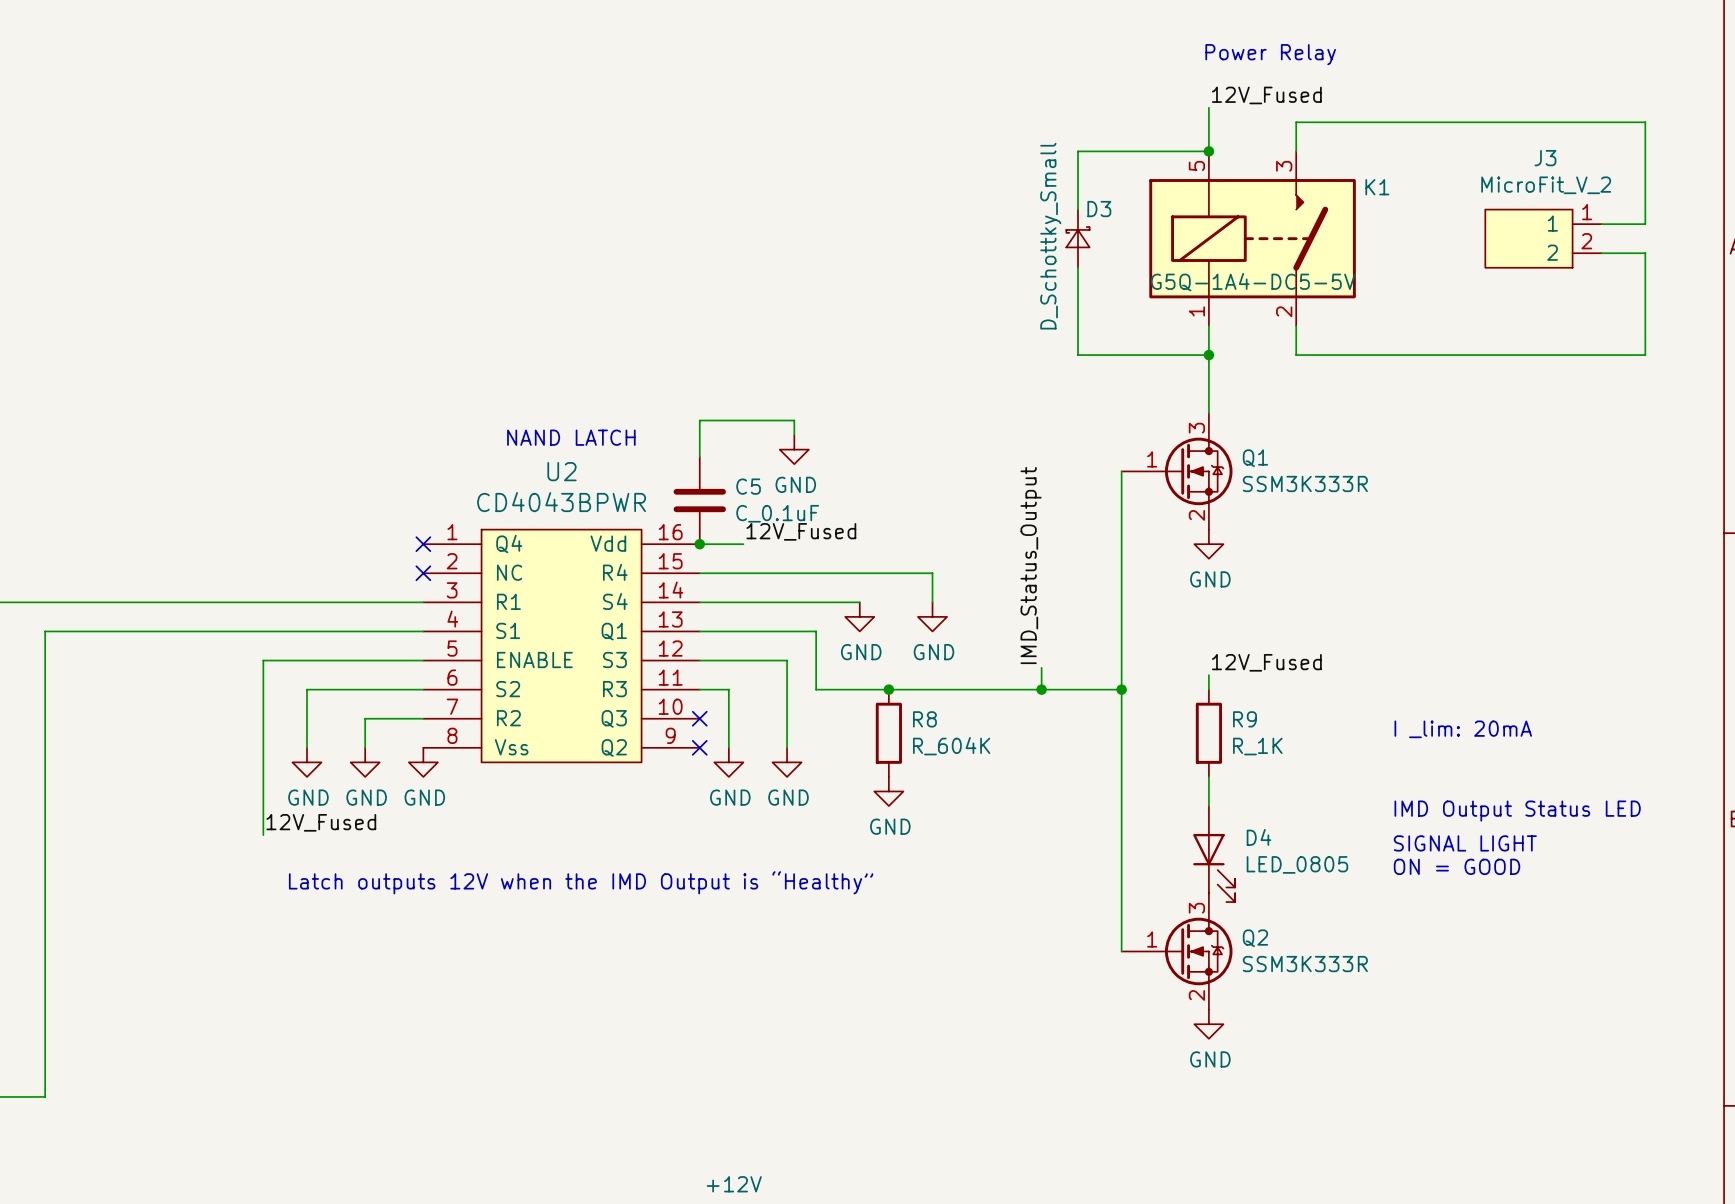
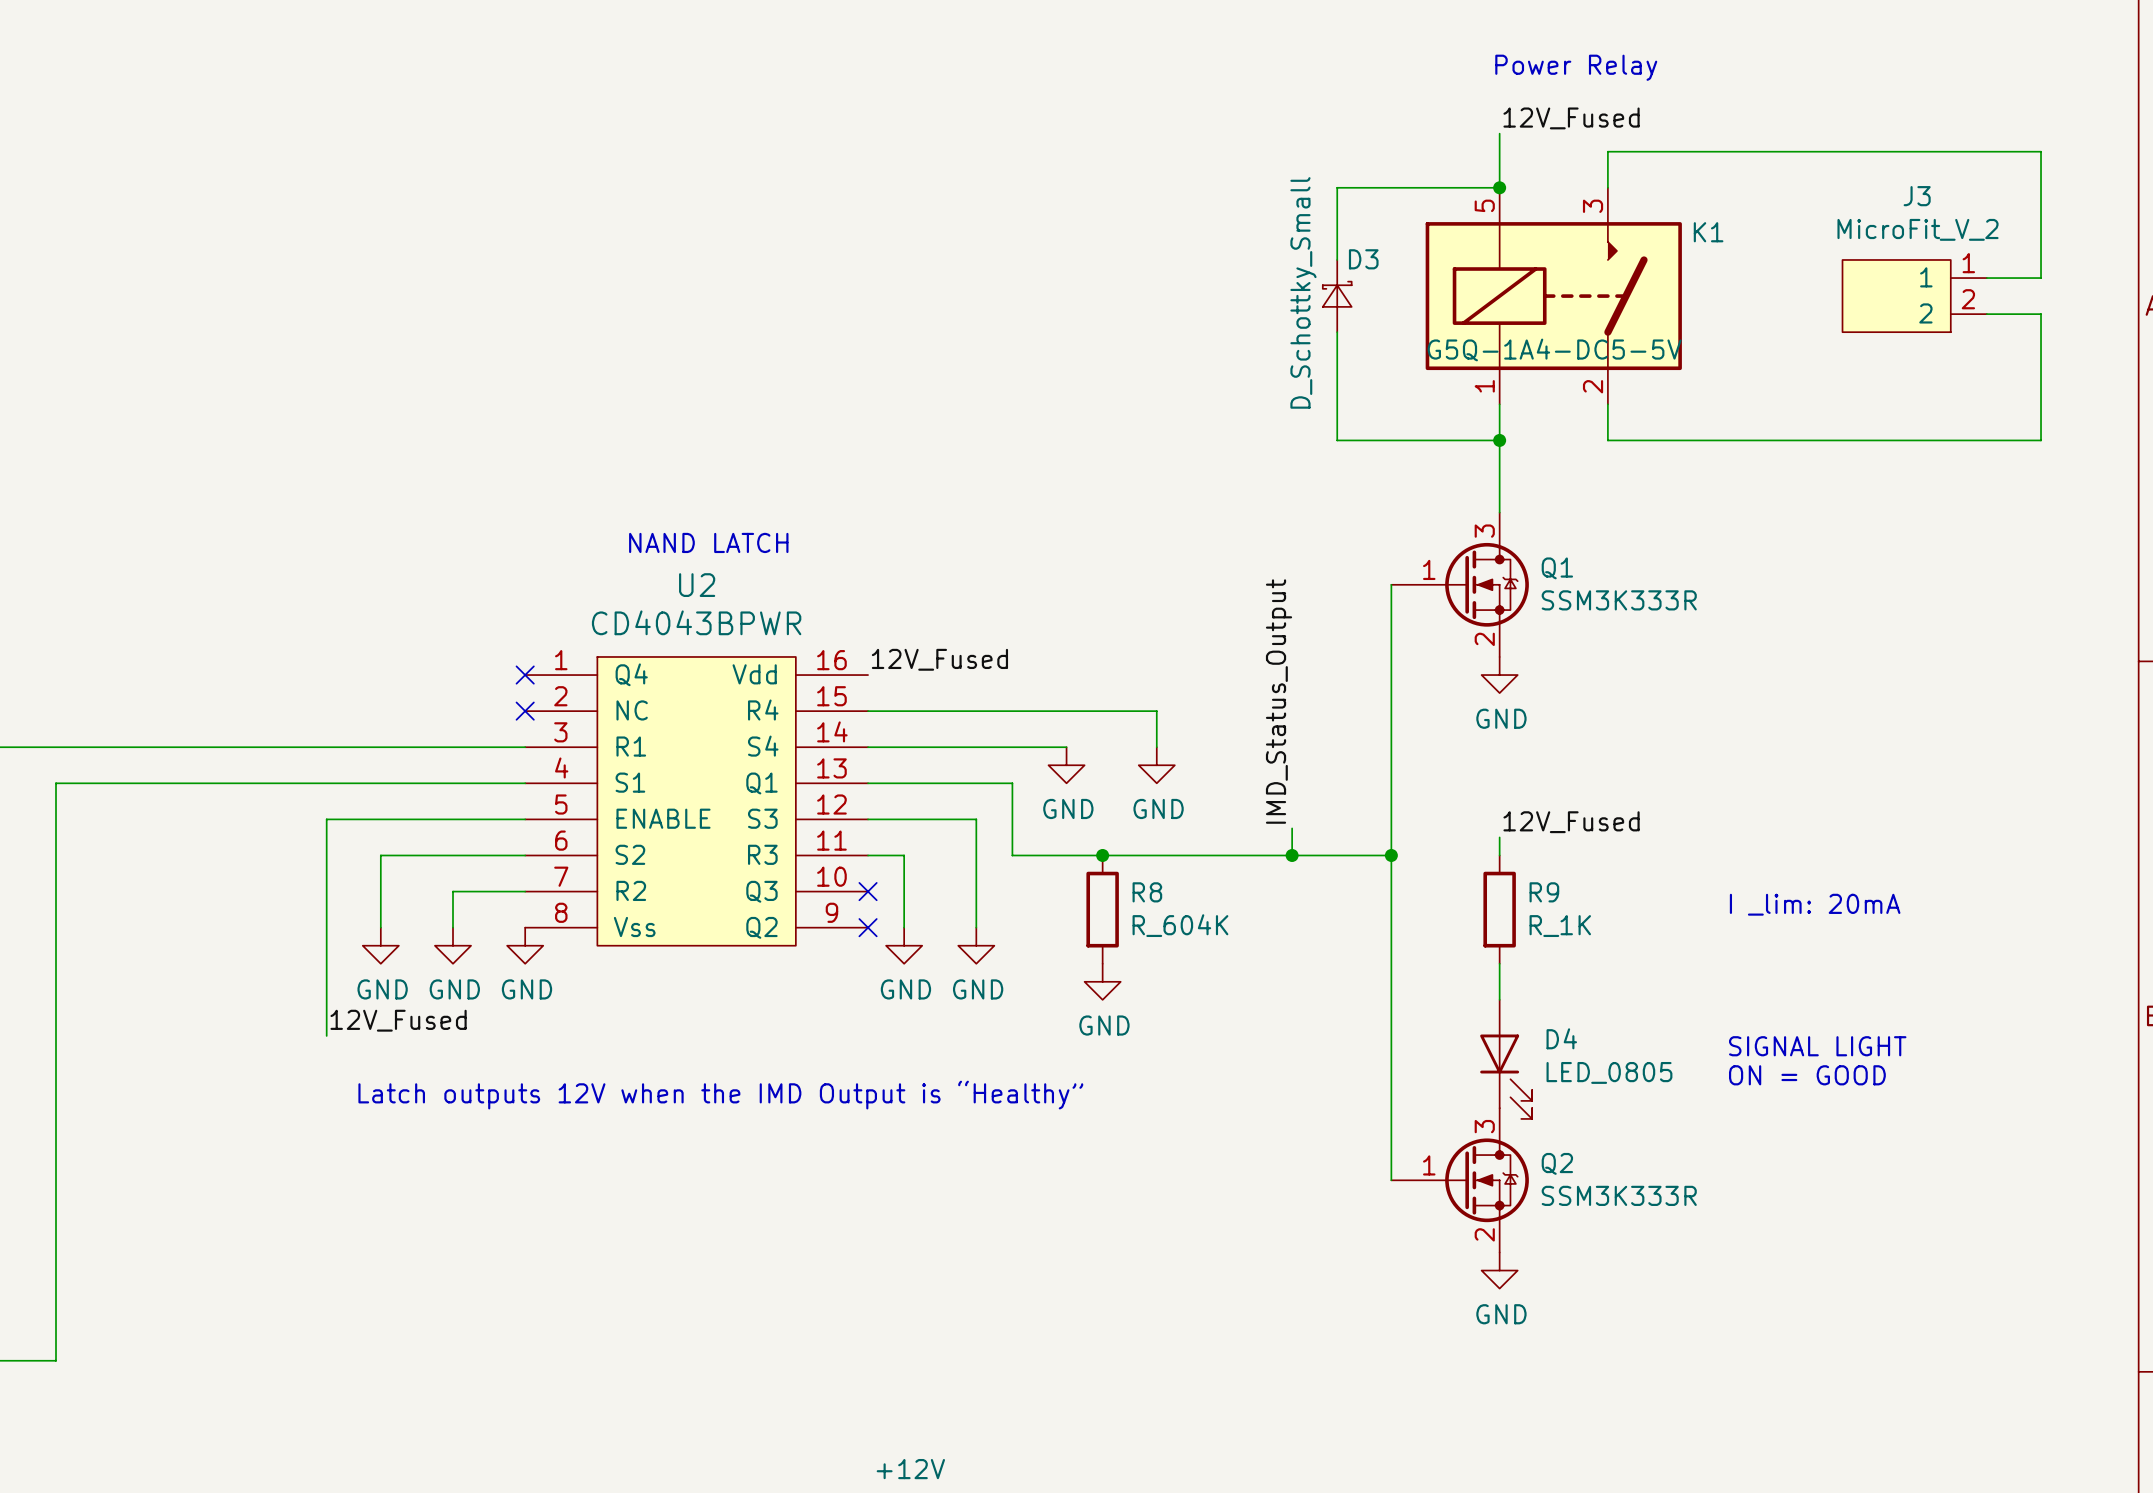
wire: (794, 435) (794, 420) (699, 420) (699, 456) -> none
power symbol: GND (794, 449) -> none
C5: C_0.1uF (699, 500) -> none
label position: 12V_Fused (801, 531) -> 12V_Fused (939, 659)
wire: (699, 544) (743, 544) -> none
junction: (699, 544) -> none
text: IMD Output Status LED (1517, 811) -> none

